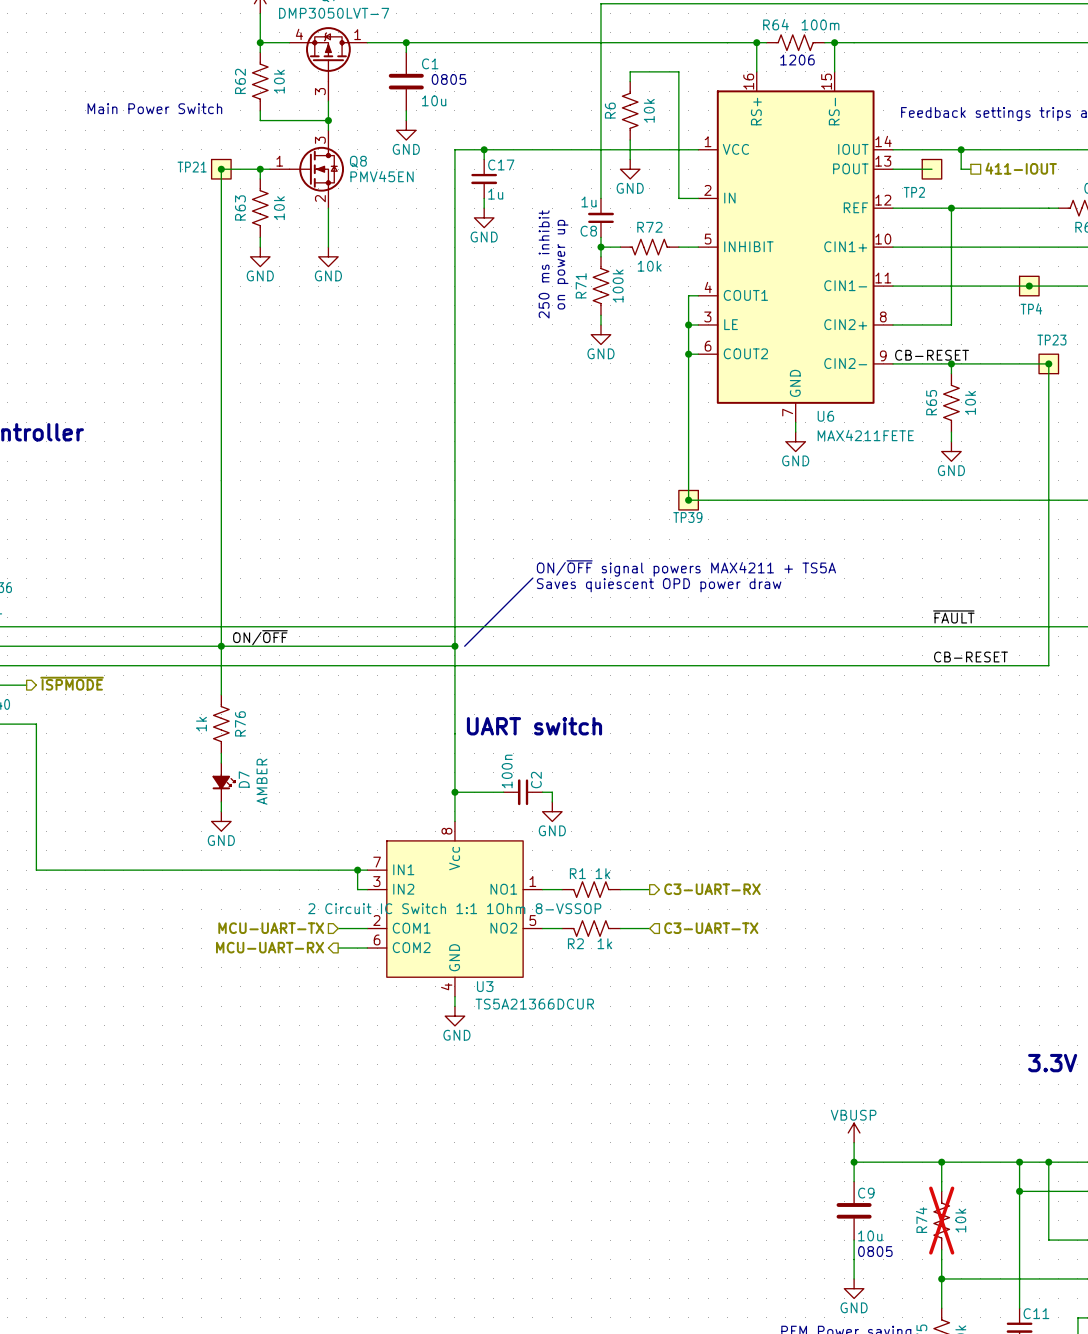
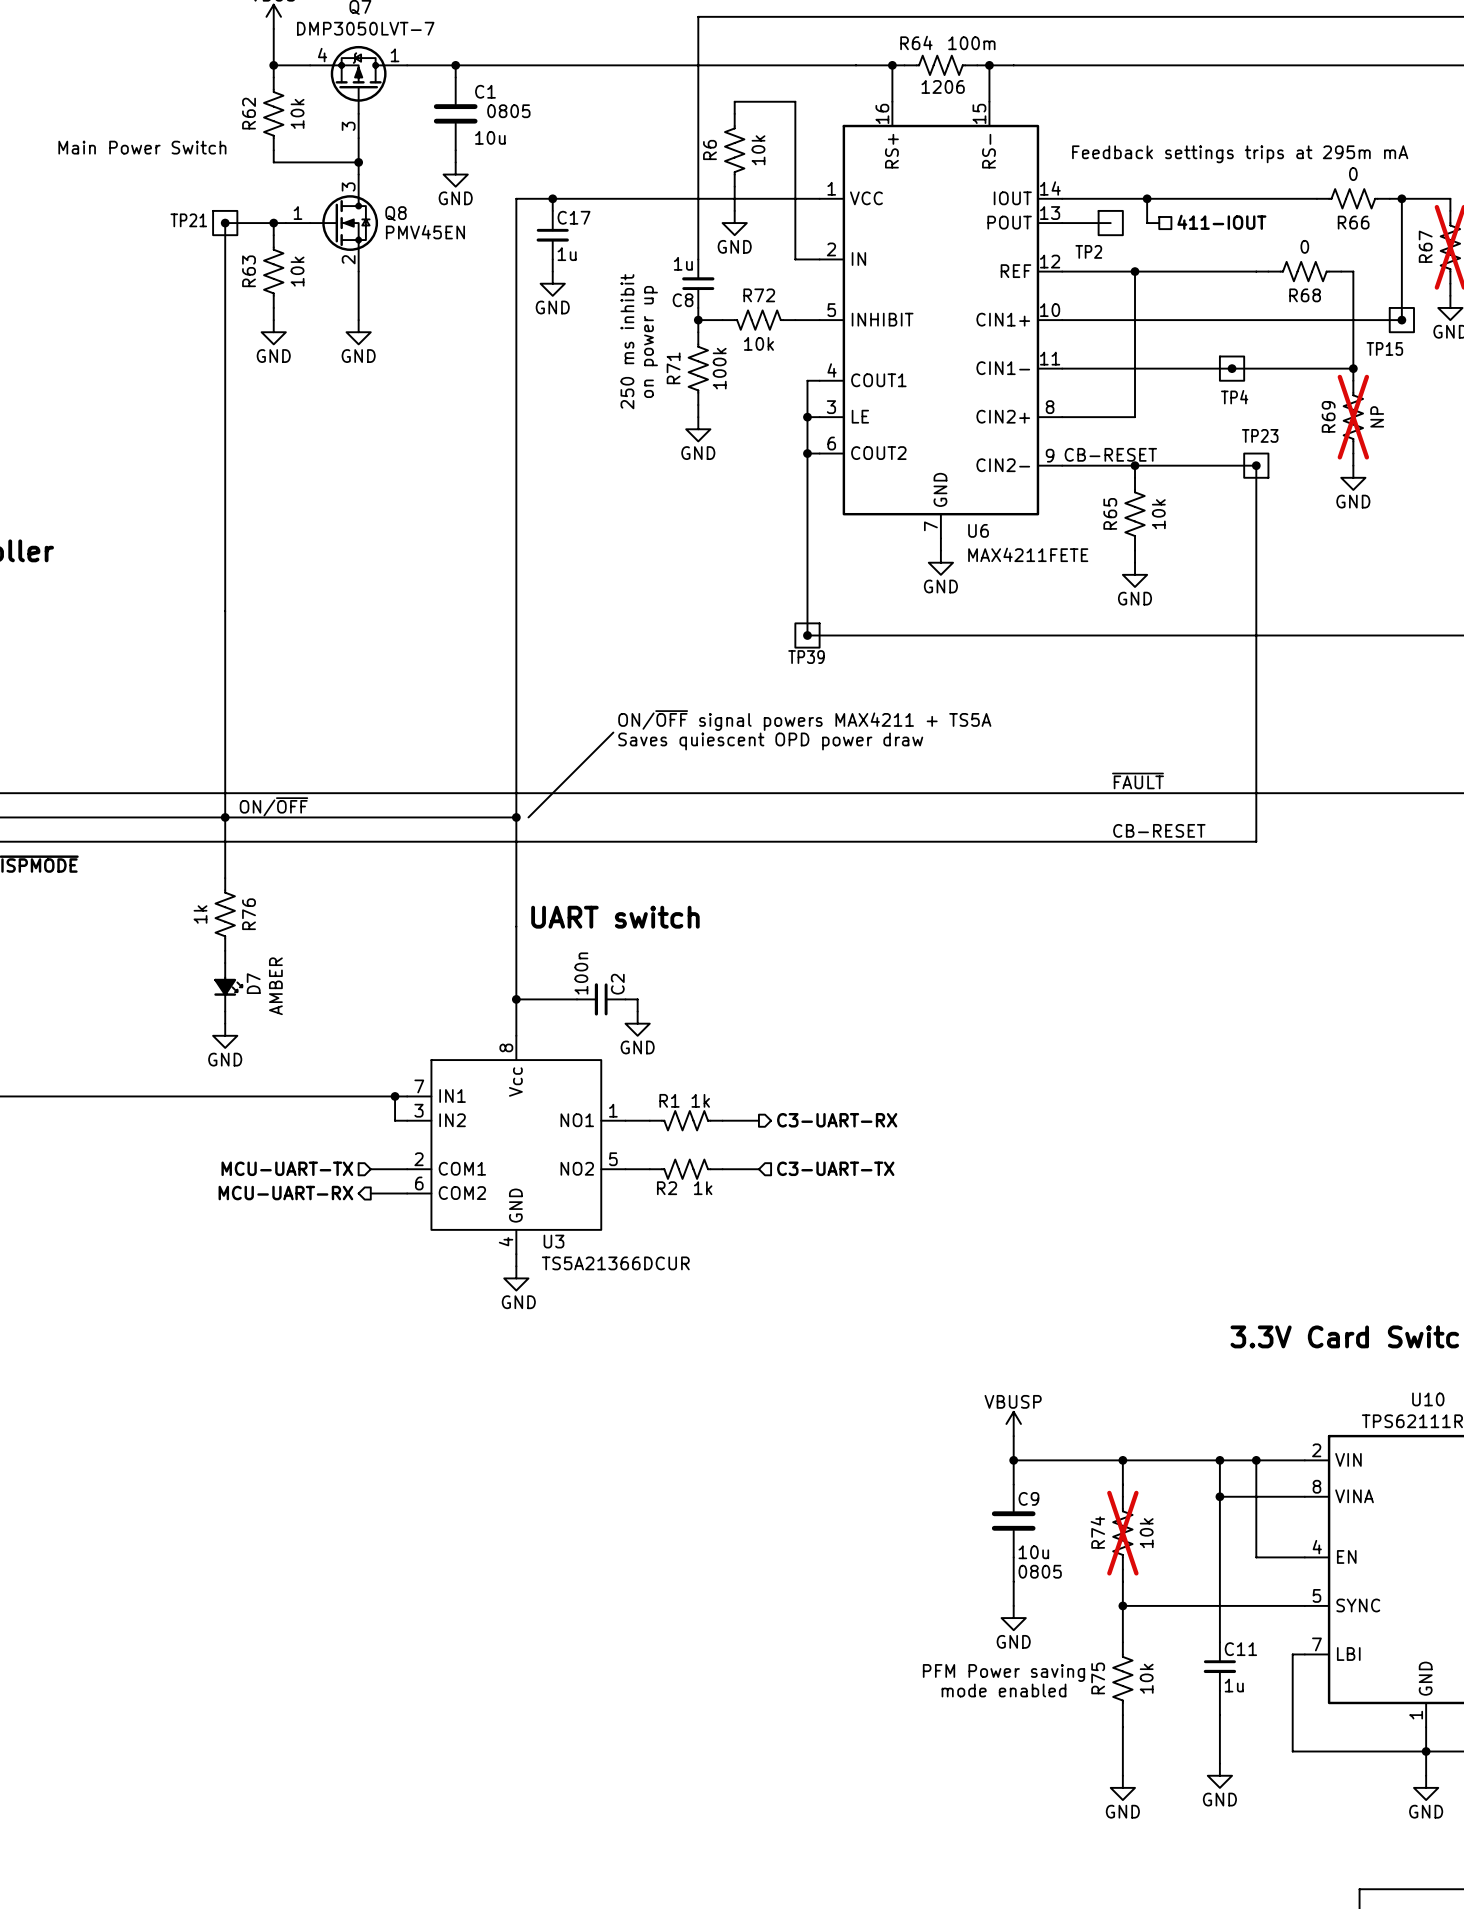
U3 text: 2 Circuit IC Switch 1:1 1Ohm 8-VSSOP (454, 908) -> none

